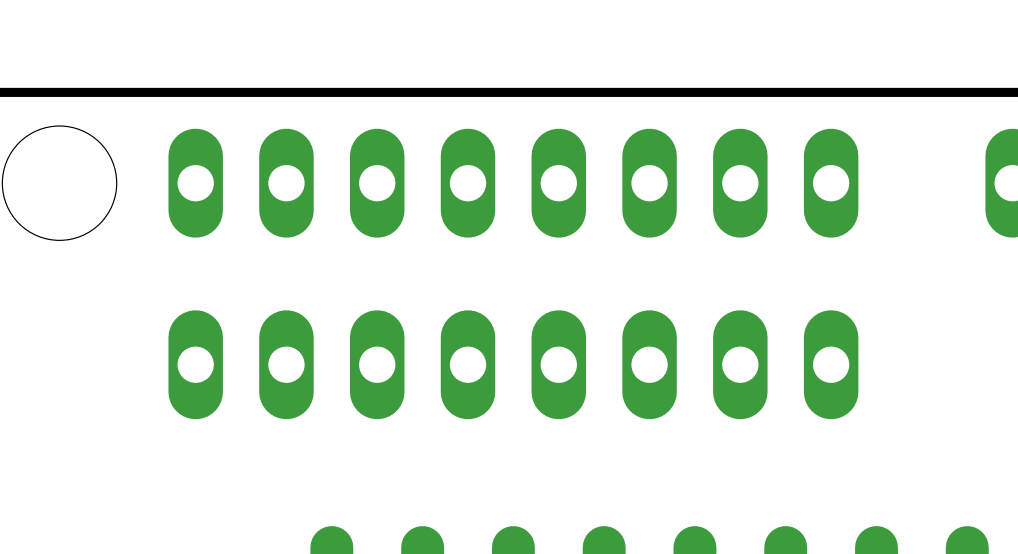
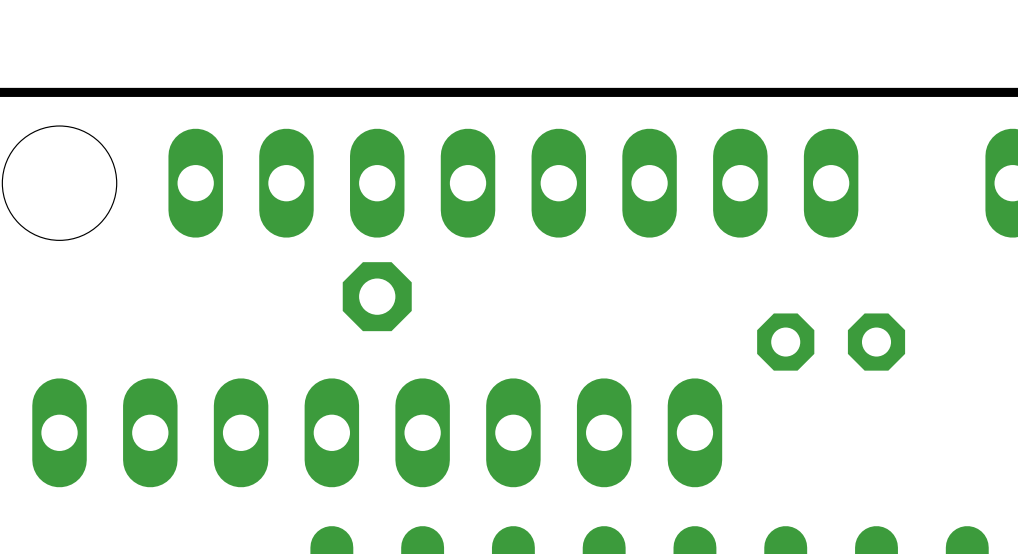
part: none -> (377, 296)
part: none -> (831, 342)
part position: (513, 364) -> (377, 432)

